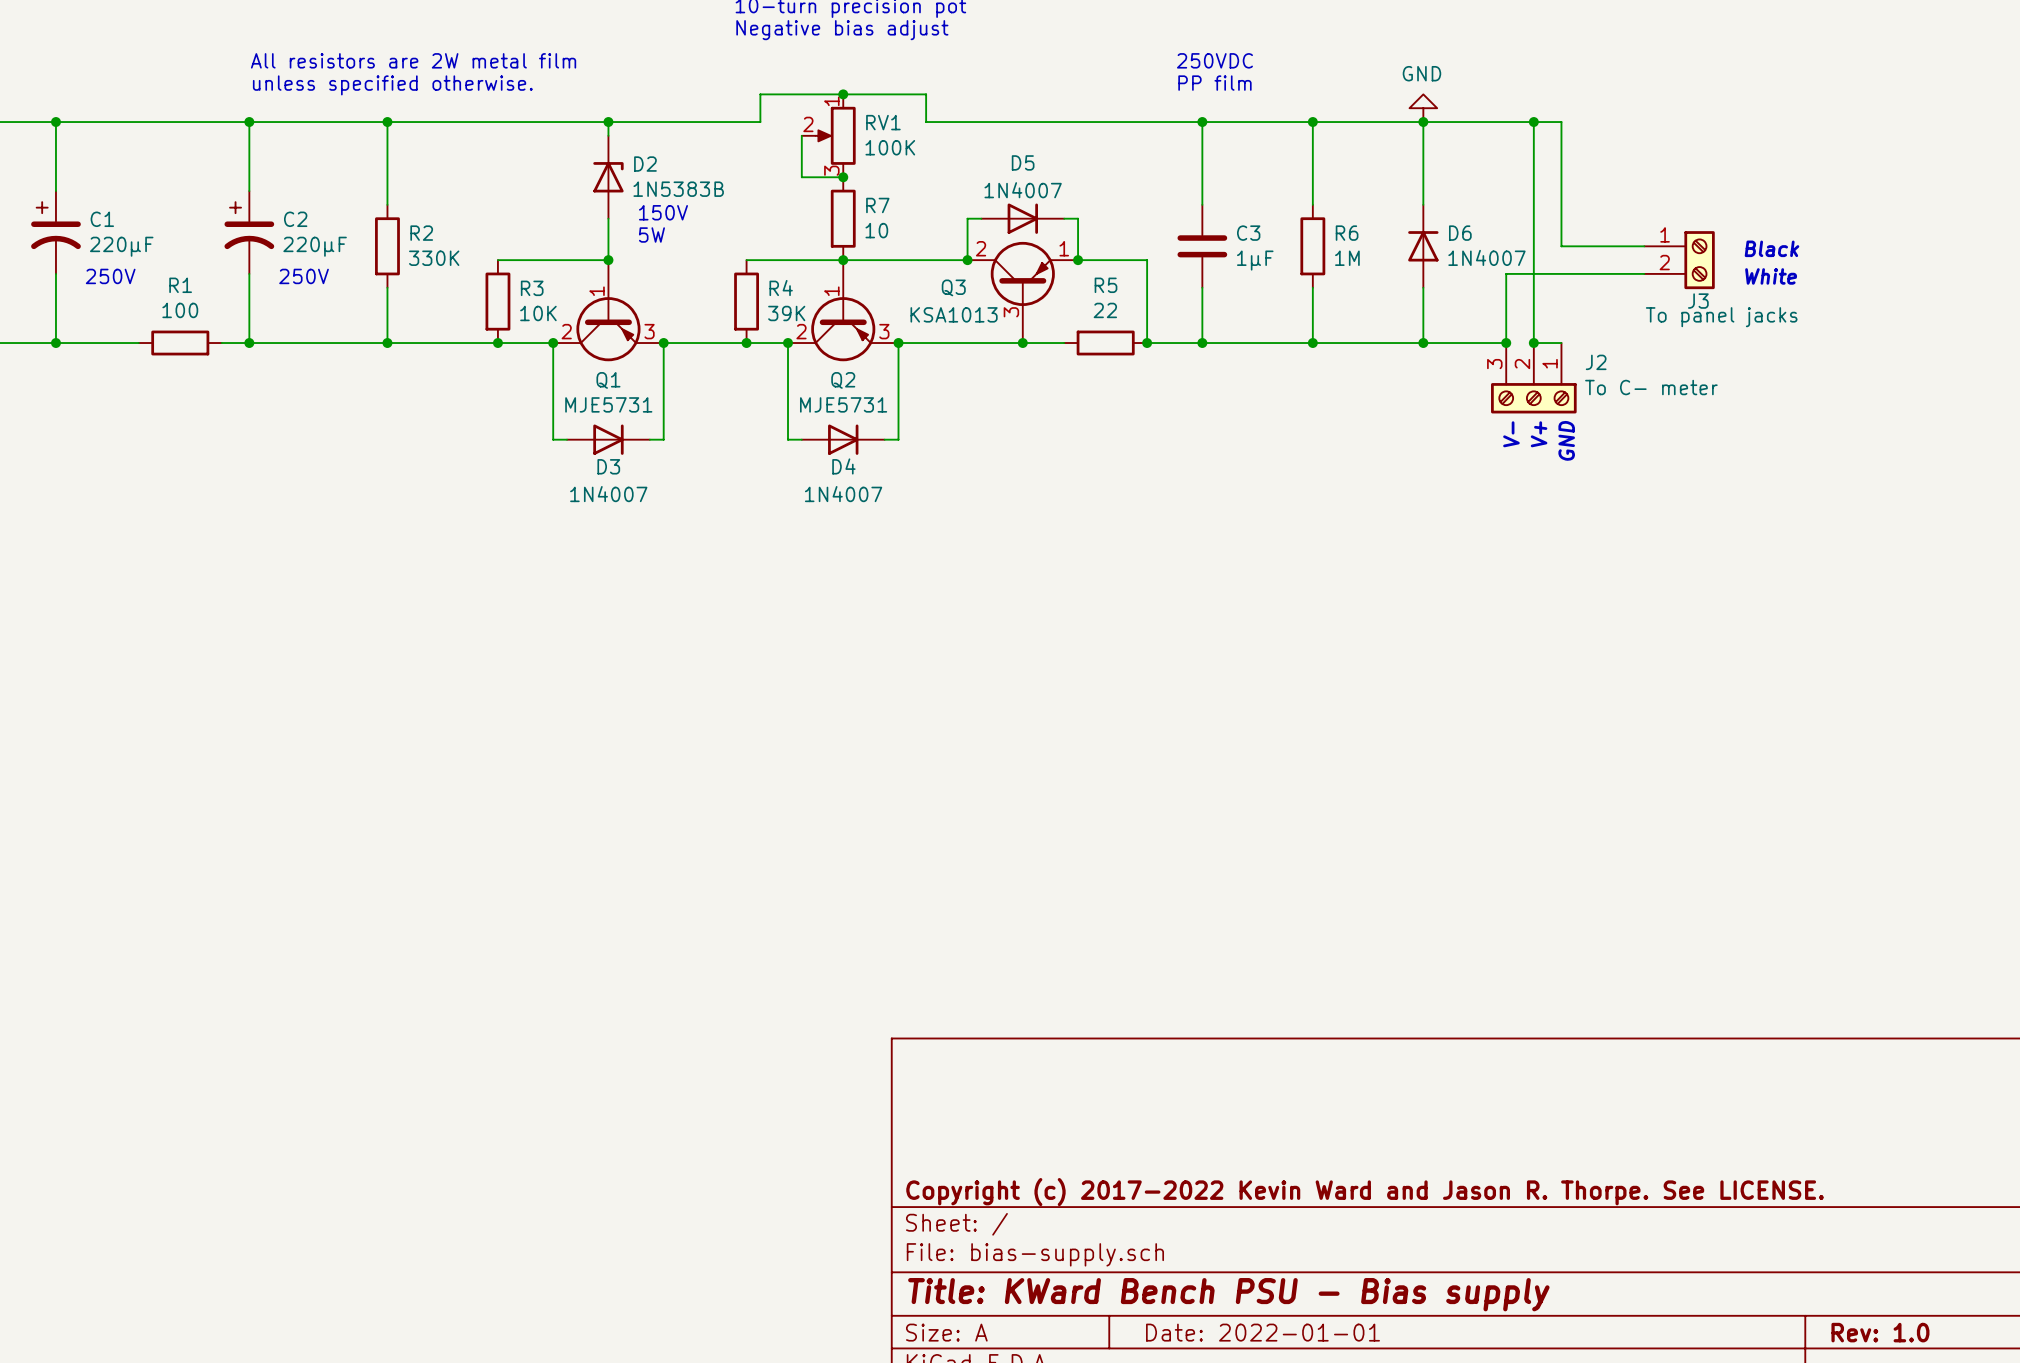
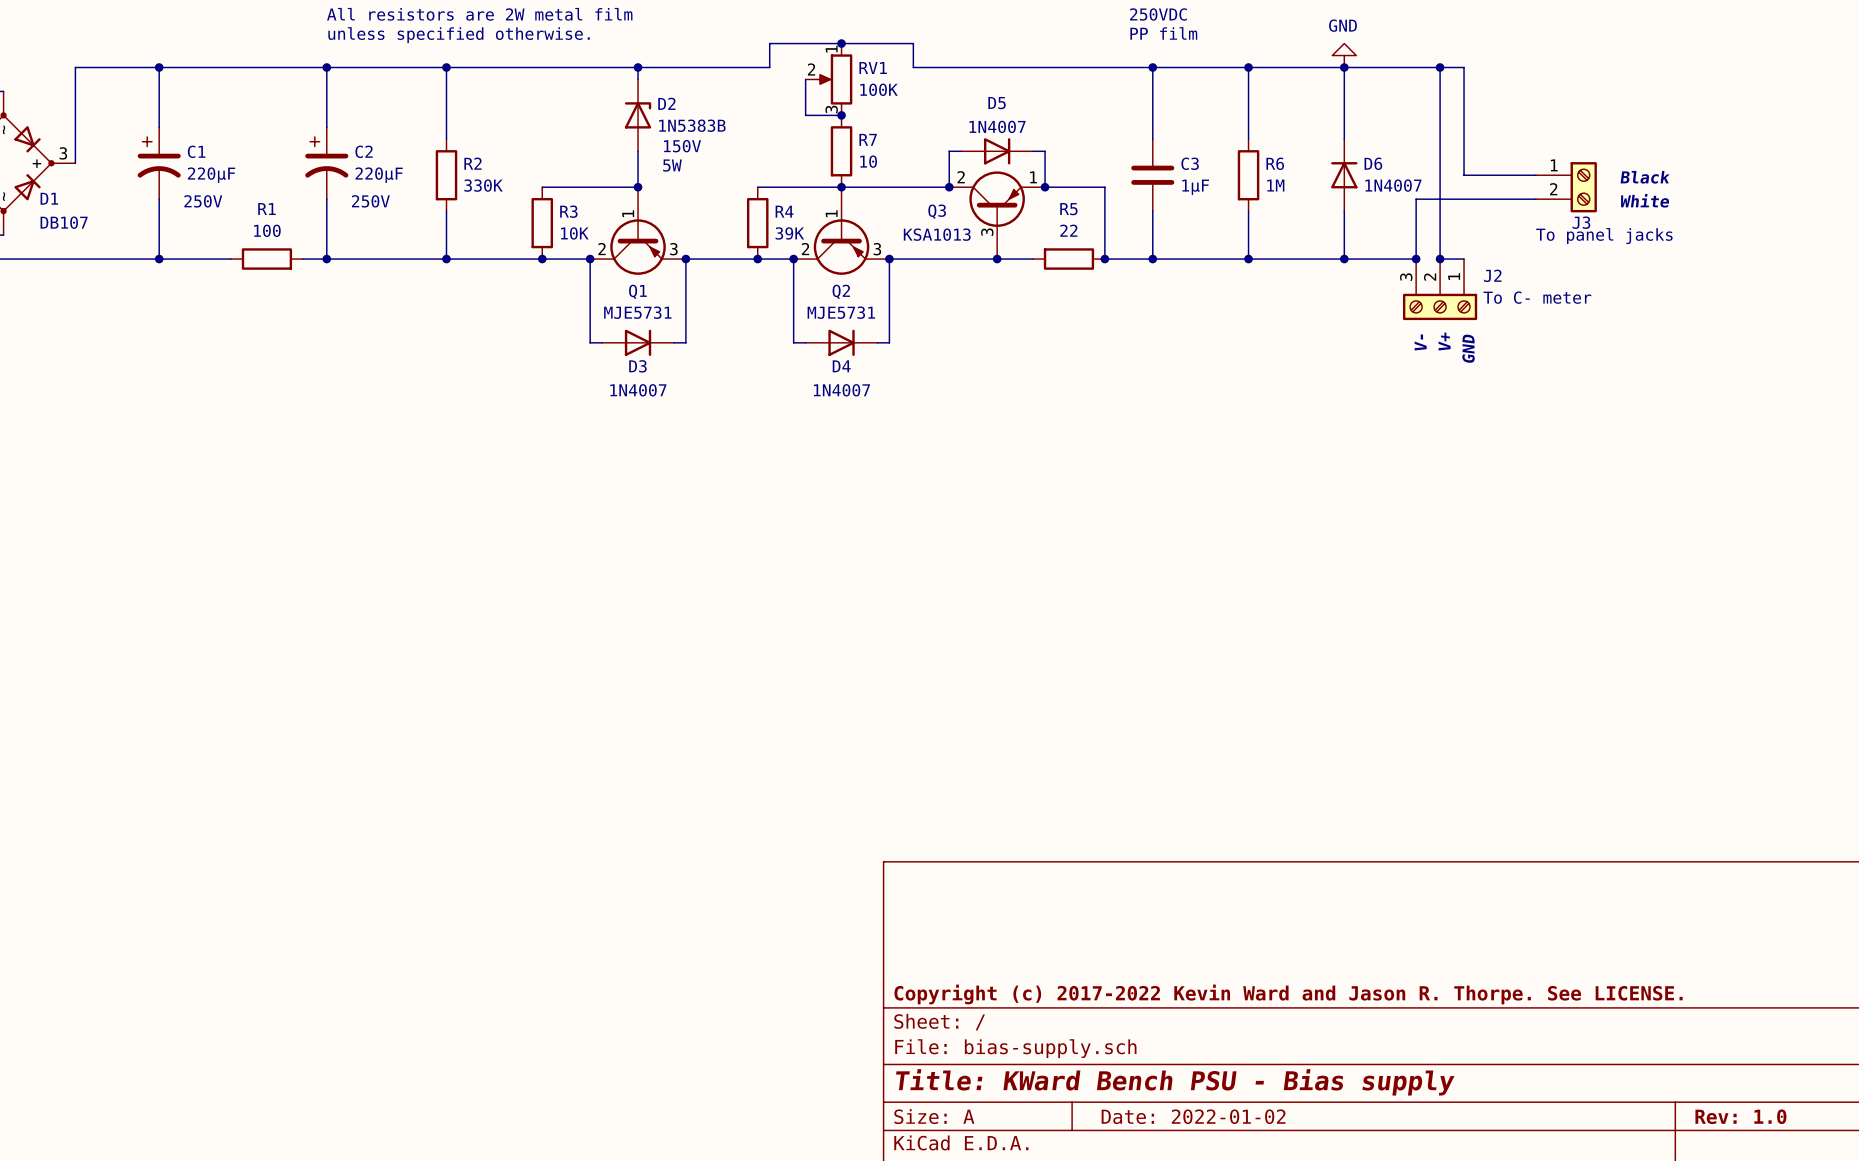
title block: Date: 2022-01-01 (1262, 1332) -> Date: 2022-01-02 (1193, 1116)

